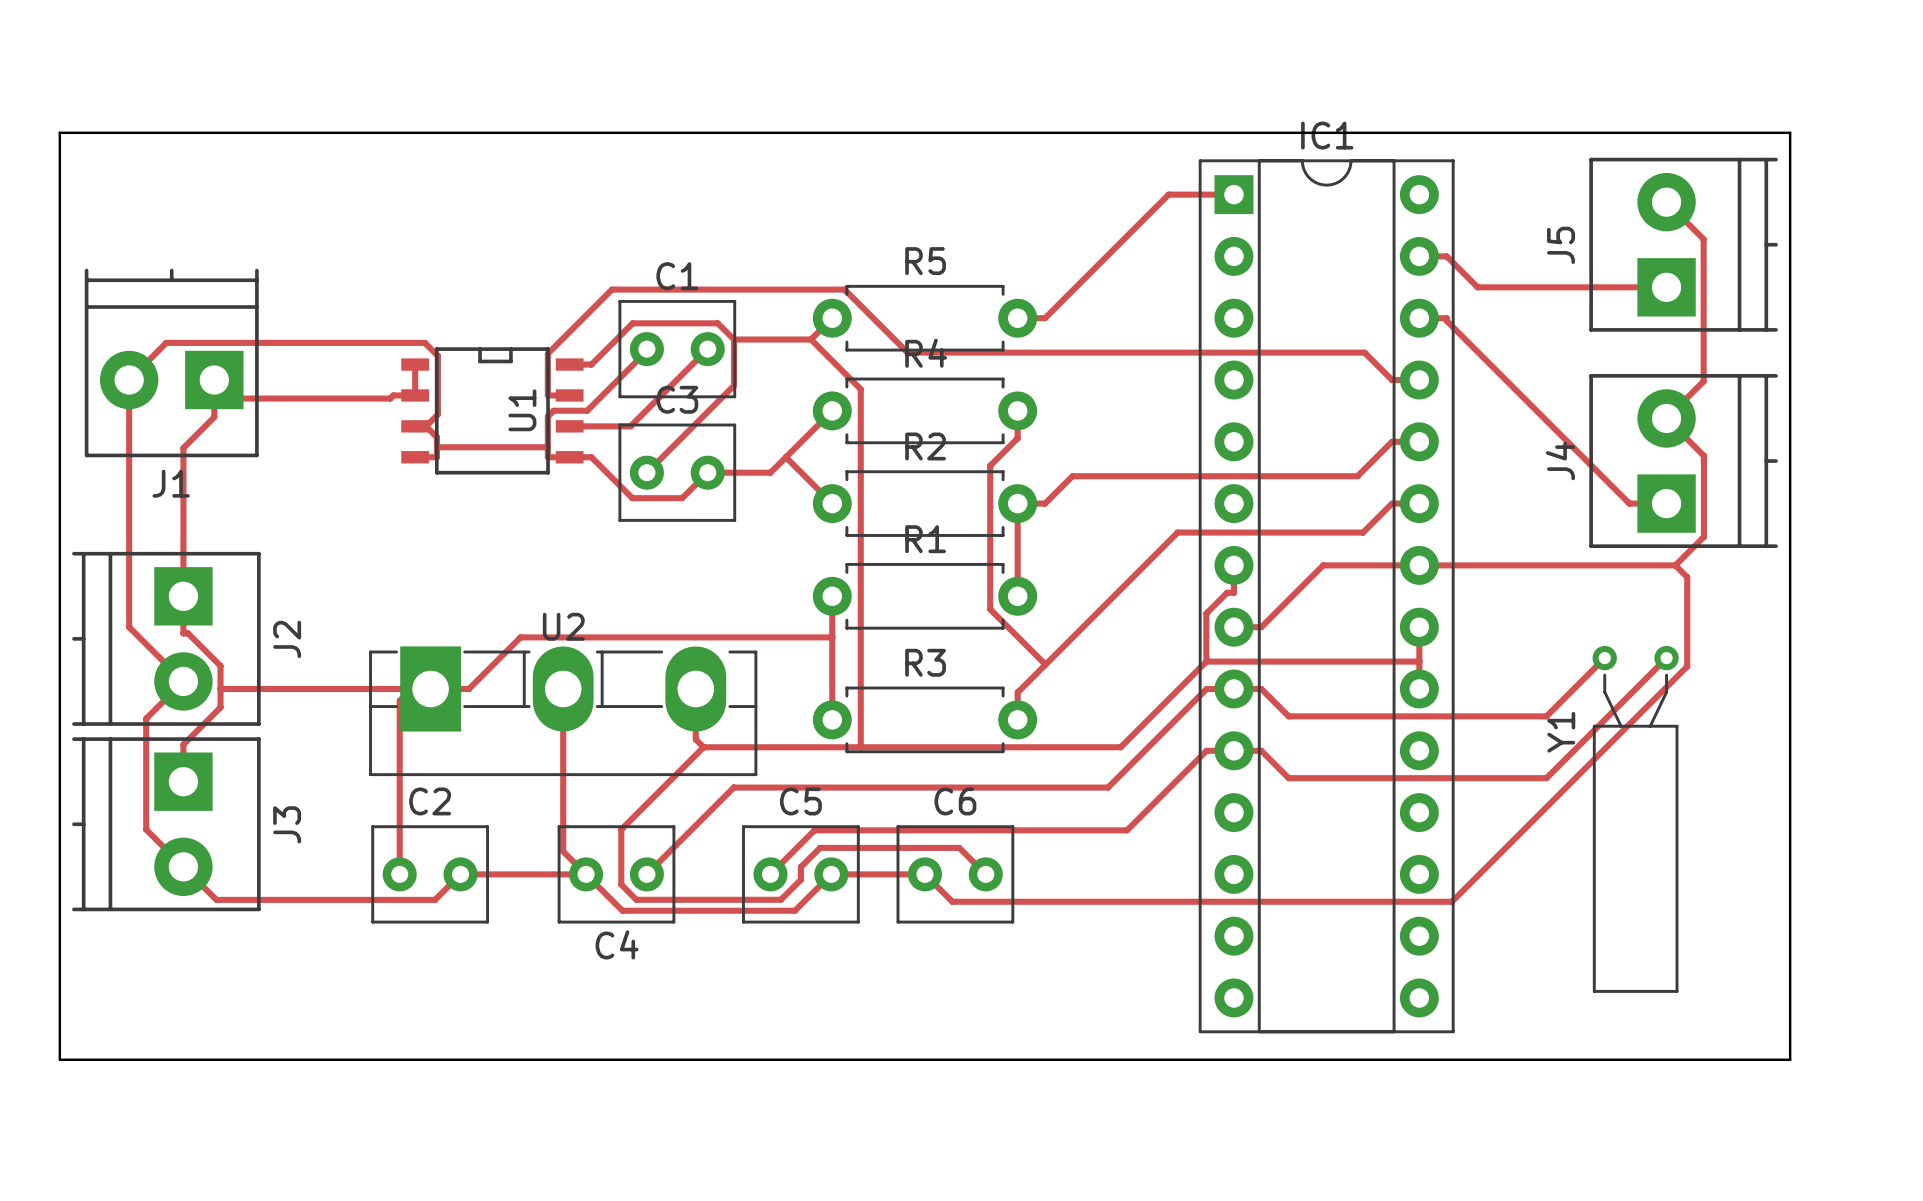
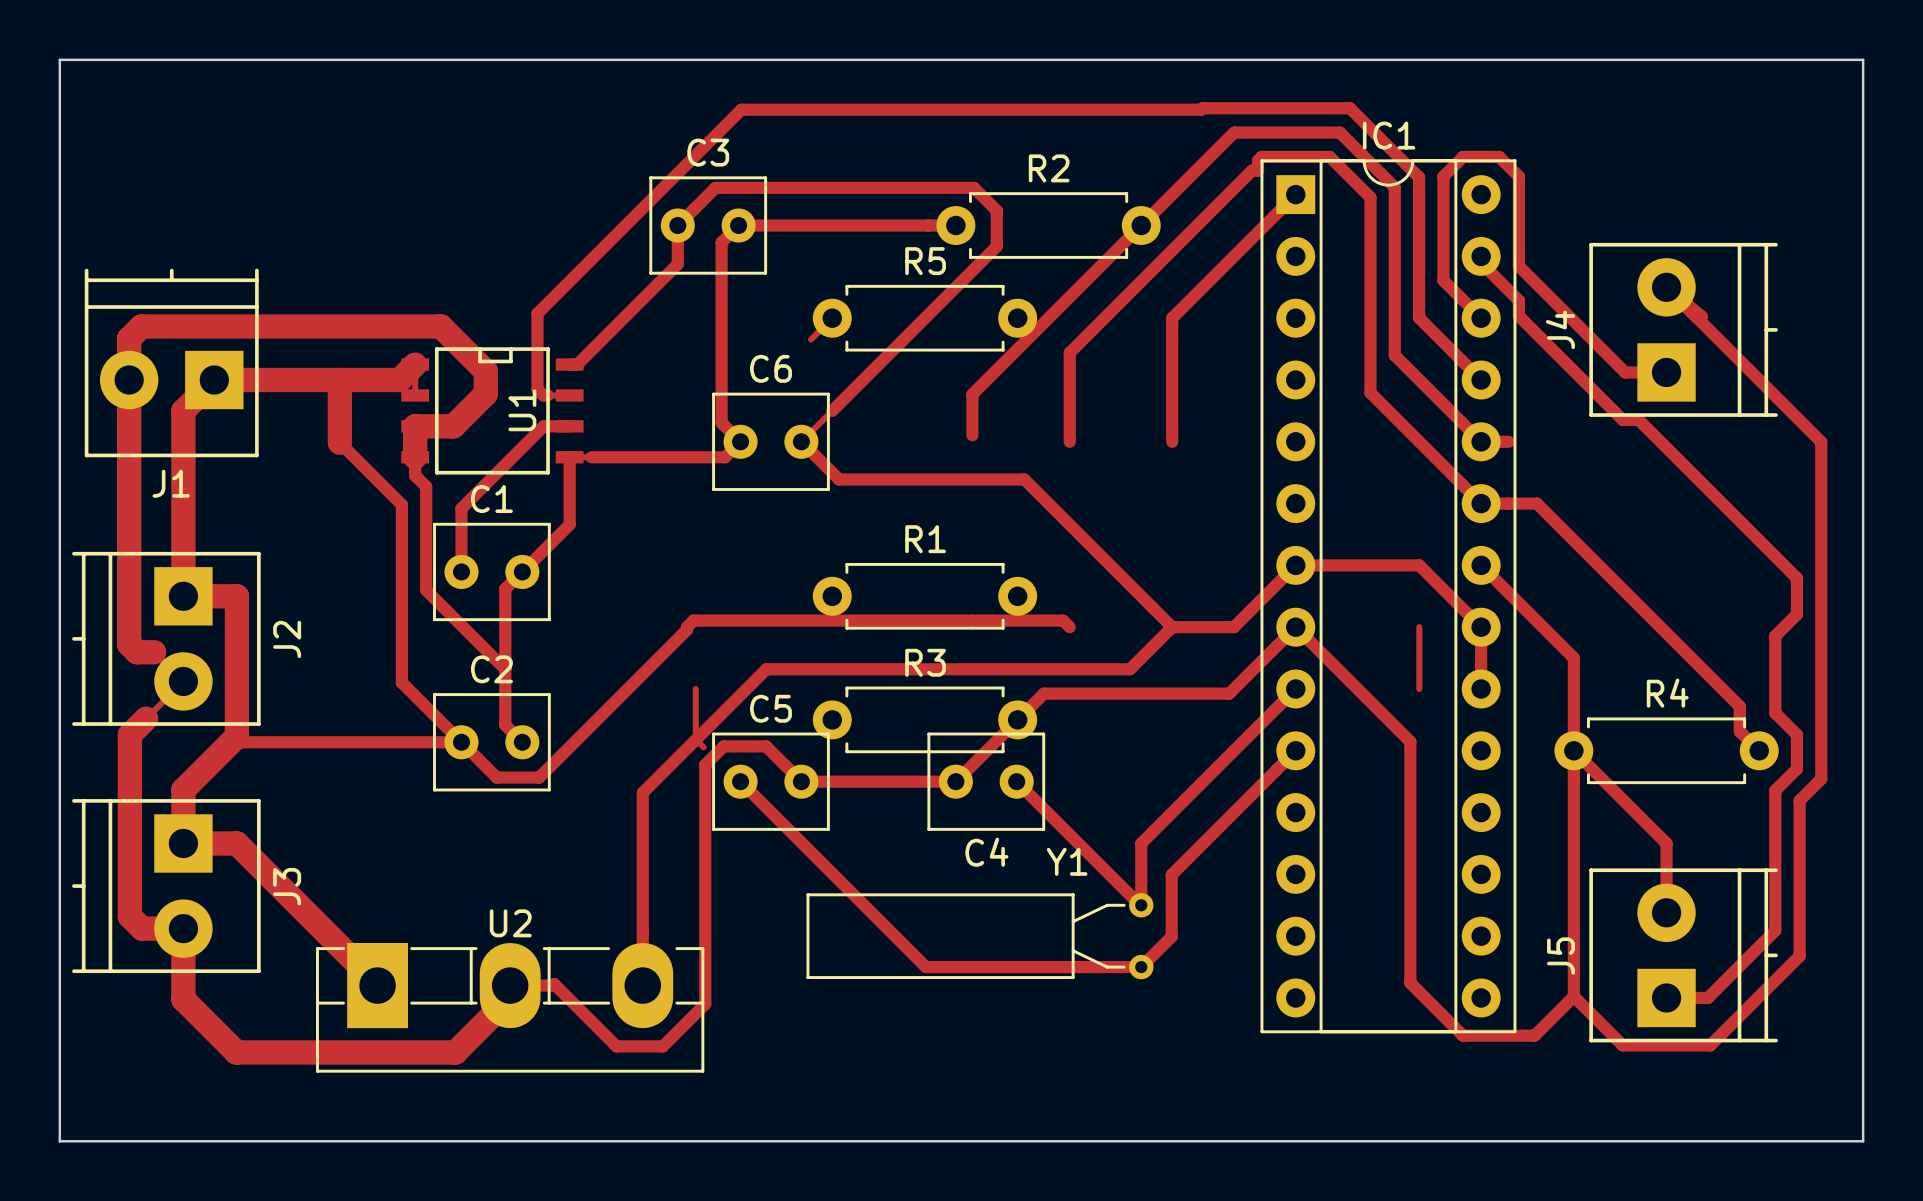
board edge: (59, 132) (1790, 132) (1790, 1059) (59, 1059) -> (59, 132) (59, 59) (1863, 59) (1863, 1141) (59, 1141) (59, 1059)
top track: (1233, 194) (1168, 194) (1045, 318) (1017, 318) -> none
top track: none -> (1295, 194) (1172, 318) (1172, 441)
top track: (1666, 202) (1703, 239) (1703, 381) (1666, 418) (1703, 455) (1703, 536) (1675, 565) -> none
J5 position: (1683, 244) -> (1683, 955)
top track: (1419, 256) (1446, 256) (1477, 287) (1666, 287) -> none
top track: none -> (1481, 256) (1481, 262) (1518, 300) (1518, 316) (1622, 419) (1638, 419) (1796, 578) (1796, 614) (1775, 636) (1775, 713) (1796, 734) (1796, 768) (1775, 790) (1775, 930) (1707, 997) (1666, 997)
top track: none -> (1695, 316) (1701, 316) (1666, 287) (1821, 442) (1821, 778) (1799, 800) (1799, 956) (1710, 1045) (1622, 1045) (1573, 996)
top track: (1419, 318) (1446, 318) (1446, 320) (1629, 503) (1666, 503) -> none
top track: none -> (1481, 318) (1443, 280) (1443, 176) (1463, 156) (1499, 156) (1518, 176) (1518, 266) (1625, 372) (1666, 372)
top track: (734, 339) (717, 323) (632, 323) (591, 364) (577, 364) -> (832, 410) (996, 246) (996, 210) (973, 187) (715, 187) (677, 225) (677, 264) (577, 364)
top track: (734, 339) (734, 385) (646, 472) -> none
top track: (734, 339) (811, 339) (860, 389) (860, 747) -> none
top track: (646, 349) (587, 410) (553, 410) (547, 416) (547, 457) (569, 457) -> (522, 742) (505, 725) (505, 589) (569, 524) (569, 457)
C1 position: (677, 349) -> (491, 571)
top track: (707, 349) (630, 426) (569, 426) -> (461, 571) (461, 508) (543, 426) (569, 426)
top track: (129, 380) (166, 342) (424, 342) (437, 355) (437, 414) (426, 426) (436, 437) (436, 457) (415, 457) -> (129, 380) (129, 338) (141, 326) (440, 326) (485, 371) (485, 393)
top track width: thin (129, 380) (129, 627) -> thick (129, 380) (129, 627)
top track: (214, 380) (214, 417) (183, 448) -> (415, 364) (399, 380) (214, 380) (183, 410) (183, 448)
top track: none -> (339, 380) (339, 442) (401, 504) (401, 682) (496, 777) (539, 777) (687, 629) (687, 627) (693, 620) (1063, 620) (1069, 627)
top track: (1419, 380) (1391, 380) (1364, 352) (907, 352) (844, 289) (611, 289) (547, 353) (547, 395) -> (1481, 380) (1419, 317) (1419, 177) (1349, 108) (741, 109) (537, 313) (537, 389) (543, 395) (547, 395)
top track: (415, 389) (415, 395) (393, 395) (390, 398) (214, 398) -> none
top track: none -> (485, 393) (453, 426) (426, 426)
R4 position: (924, 410) -> (1666, 750)
top track: (1017, 410) (1017, 438) (990, 465) (990, 609) (1045, 664) -> none
top track: none -> (415, 426) (415, 475) (426, 486) (426, 590) (505, 669)
top track: none -> (972, 435) (972, 394) (1234, 132) (1339, 132) (1394, 187) (1394, 355) (1481, 441) (1508, 441)
top track: (801, 441) (770, 472) (707, 472) (682, 498) (632, 498) (591, 457) -> (955, 225) (738, 225) (721, 242) (721, 422) (740, 441) (725, 457) (591, 457)
top track: none -> (801, 441) (839, 479) (1024, 479) (1172, 627)
top track: none -> (1069, 441) (1069, 352) (1252, 170) (1258, 170) (1258, 160) (1261, 156) (1329, 156) (1370, 197) (1370, 392) (1481, 503) (1536, 503) (1739, 706) (1739, 731) (1759, 750)
top track: (1419, 441) (1391, 441) (1357, 476) (1072, 476) (1045, 503) (1017, 503) (1017, 596) -> none
top track: (436, 447) (547, 447) -> none
top track width: thin (183, 448) (183, 596) -> thick (183, 448) (183, 596)
top track: (785, 457) (832, 503) -> none
J4 position: (1683, 461) -> (1683, 329)
C3 position: (677, 472) -> (708, 225)
R2 position: (924, 503) -> (1048, 225)
top track: (1419, 503) (1391, 503) (1363, 532) (1177, 532) (1017, 692) (1017, 719) -> none
top track: (1233, 565) (1233, 592) (1227, 592) (1206, 613) (1206, 661) -> none
top track: (1323, 565) (1261, 627) (1233, 627) -> (1323, 565) (1295, 565) (1233, 627) (1172, 627)
top track width: thin (1323, 565) (1419, 565) -> thick (1323, 565) (1419, 565)
top track: (1419, 565) (1675, 565) -> (1419, 565) (1481, 627) (1481, 688)
top track: none -> (1481, 565) (1573, 658) (1573, 996)
top track: (1675, 565) (1687, 577) (1687, 666) (1451, 901) (952, 901) (924, 874) (831, 874) (794, 910) (622, 910) (563, 851) (563, 688) -> none
top track: (183, 596) (183, 633) (188, 633) (220, 665) (220, 707) (183, 744) (183, 781) -> (183, 596) (236, 596) (236, 736)
top track: (832, 596) (832, 719) -> none
IC1 position: (1326, 596) -> (1388, 596)
top track: (129, 627) (154, 652) -> (129, 627) (129, 644) (137, 652) (154, 652)
top track: none -> (1172, 627) (1130, 669) (766, 669) (642, 792) (642, 985)
top track: (832, 637) (520, 637) (468, 688) (220, 688) -> none
top track: (1604, 658) (1546, 716) (1288, 716) (1261, 688) (1206, 688) (1108, 787) (733, 787) (646, 874) -> none
top track: (1666, 658) (1546, 778) (1288, 778) (1261, 750) (1206, 750) (1127, 830) (814, 830) (770, 874) -> none
top track: (1206, 661) (1419, 661) -> none
top track: (1206, 661) (1120, 747) (703, 747) (621, 829) (621, 884) (636, 899) (780, 899) (800, 879) (800, 867) (820, 847) (959, 847) (985, 874) -> none
top track: (411, 688) (399, 700) (399, 874) -> none
top track: none -> (1295, 688) (1141, 843) (1141, 905) (1016, 781)
U2 position: (563, 711) -> (510, 1007)
top track: (146, 718) (146, 829) (216, 899) (435, 899) (460, 874) (586, 874) -> (146, 718) (129, 734) (129, 916) (142, 928) (183, 928) (183, 999) (236, 1052) (455, 1052) (510, 997) (510, 985) (554, 984) (616, 1046) (662, 1046) (705, 1004) (705, 764) (723, 746) (766, 746) (801, 781) (955, 781) (1043, 693) (1229, 693) (1295, 627) (1410, 741) (1410, 982) (1463, 1035) (1534, 1035) (1573, 996)
top track: none -> (236, 736) (242, 742) (461, 742)
top track: none -> (236, 736) (183, 789) (183, 843) (236, 843) (377, 985)
top track: none -> (1295, 750) (1171, 874) (1171, 936) (1141, 967) (925, 967) (740, 781)
top track: none -> (1573, 750) (1666, 843) (1666, 912)
Y1 rotation: 0° (1635, 819) -> 90° clockwise (979, 936)
Y1 position: (1635, 819) -> (979, 936)
J3 position: (166, 824) -> (166, 886)
C2 position: (430, 874) -> (491, 742)
C4 position: (616, 874) -> (986, 781)
C5 position: (800, 874) -> (770, 781)
C6 position: (955, 874) -> (770, 441)

